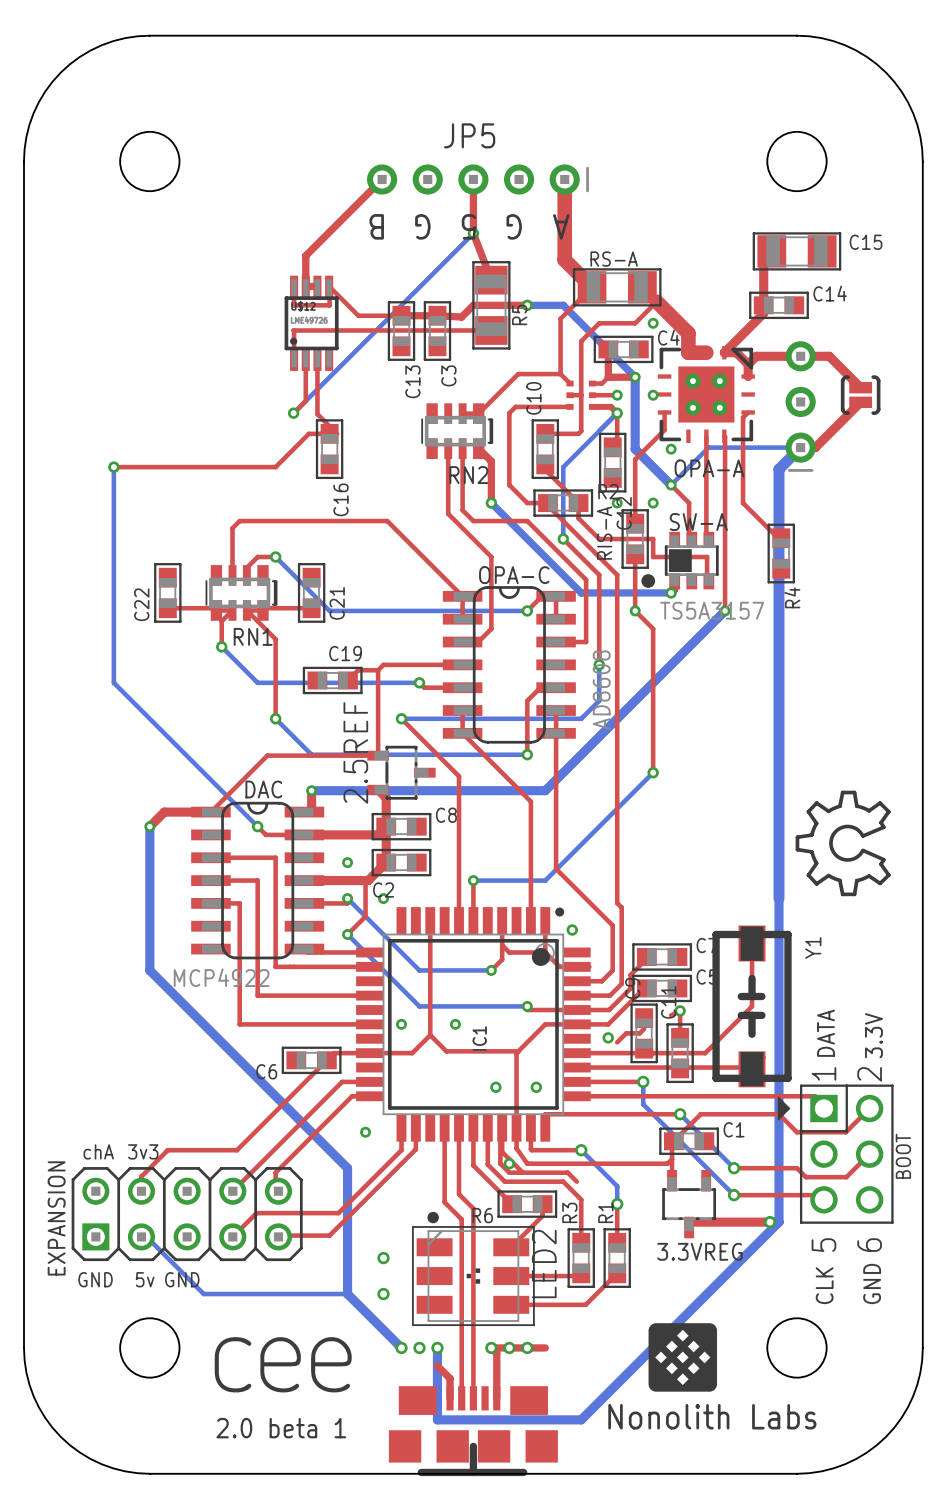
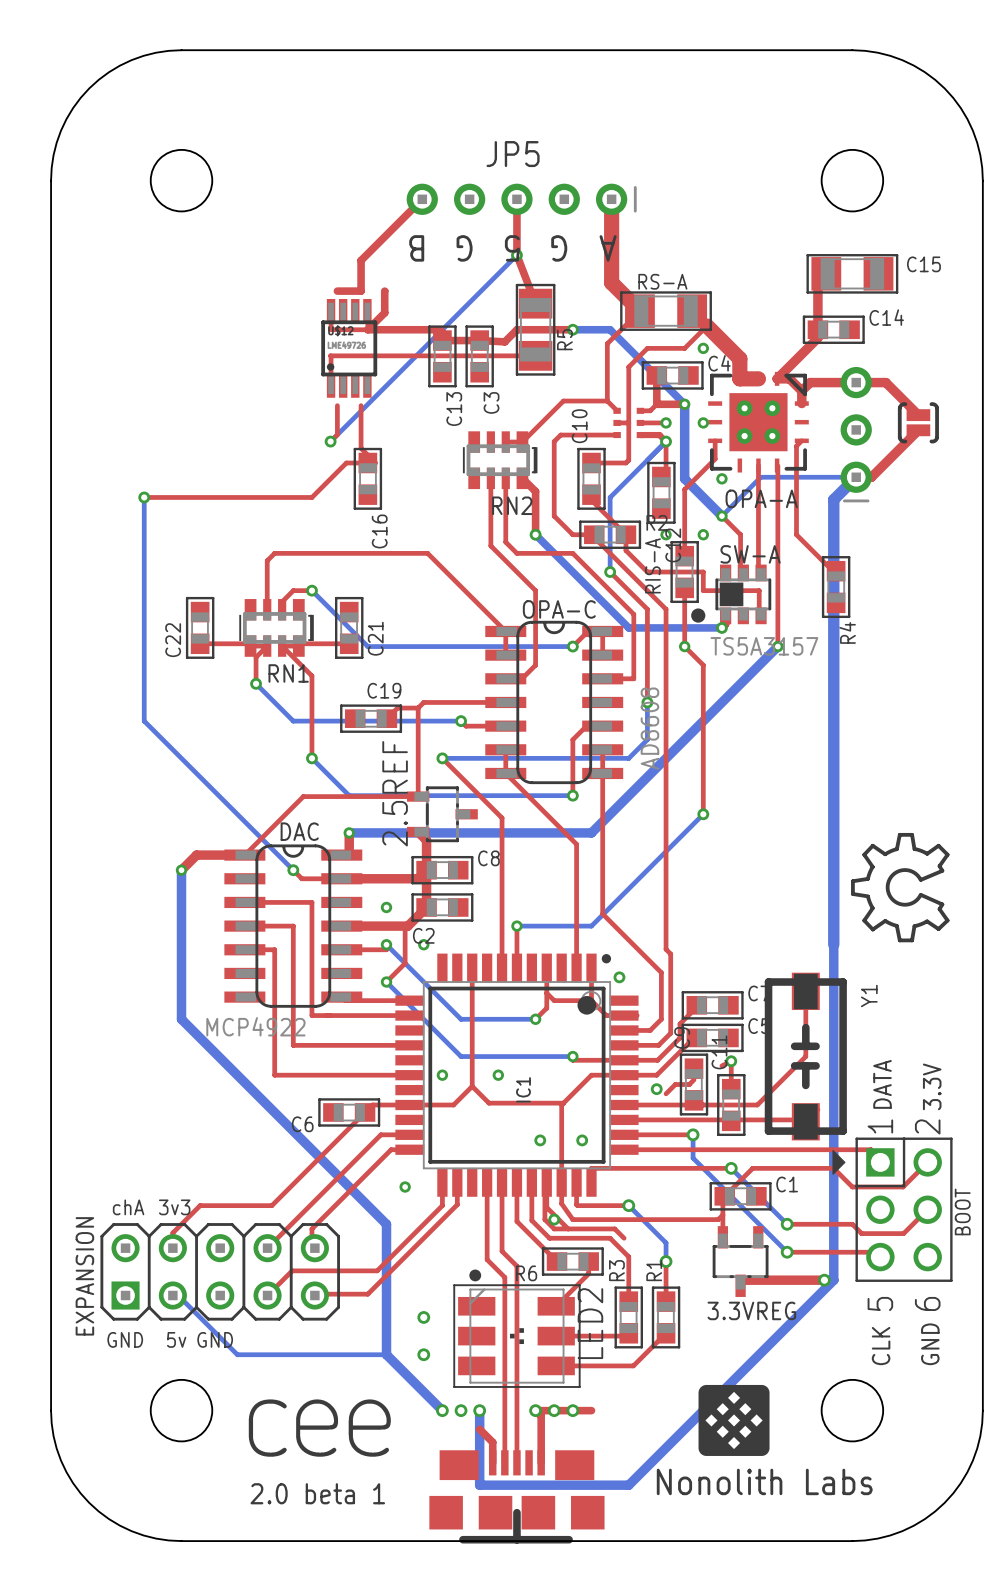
top track: (323, 238) (305, 255) (305, 286) (317, 286) -> (361, 260) (361, 291) (337, 291)
top track: (329, 286) (358, 315) (401, 315) -> (386, 291) (384, 291) (384, 312) (367, 329) (439, 329) (442, 332) (442, 340)
top track: (305, 360) (305, 401) (300, 406) -> (337, 405) (337, 434)
top track: (317, 360) (317, 414) (323, 419) -> (361, 405) (361, 448)

